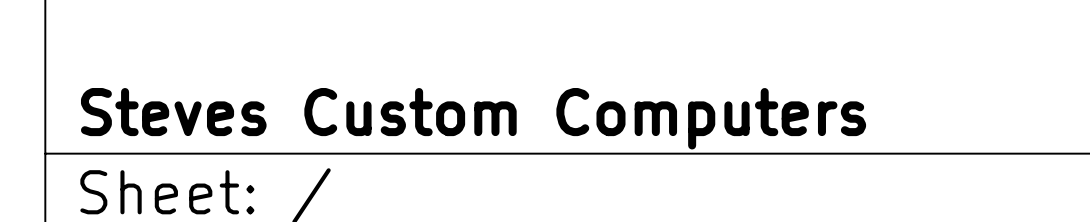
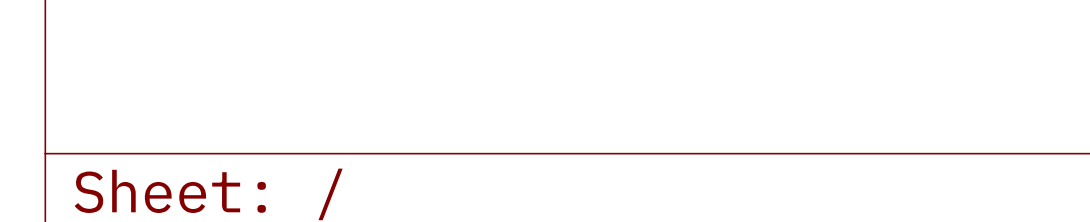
title block: Steves Custom Computers (473, 118) -> none

